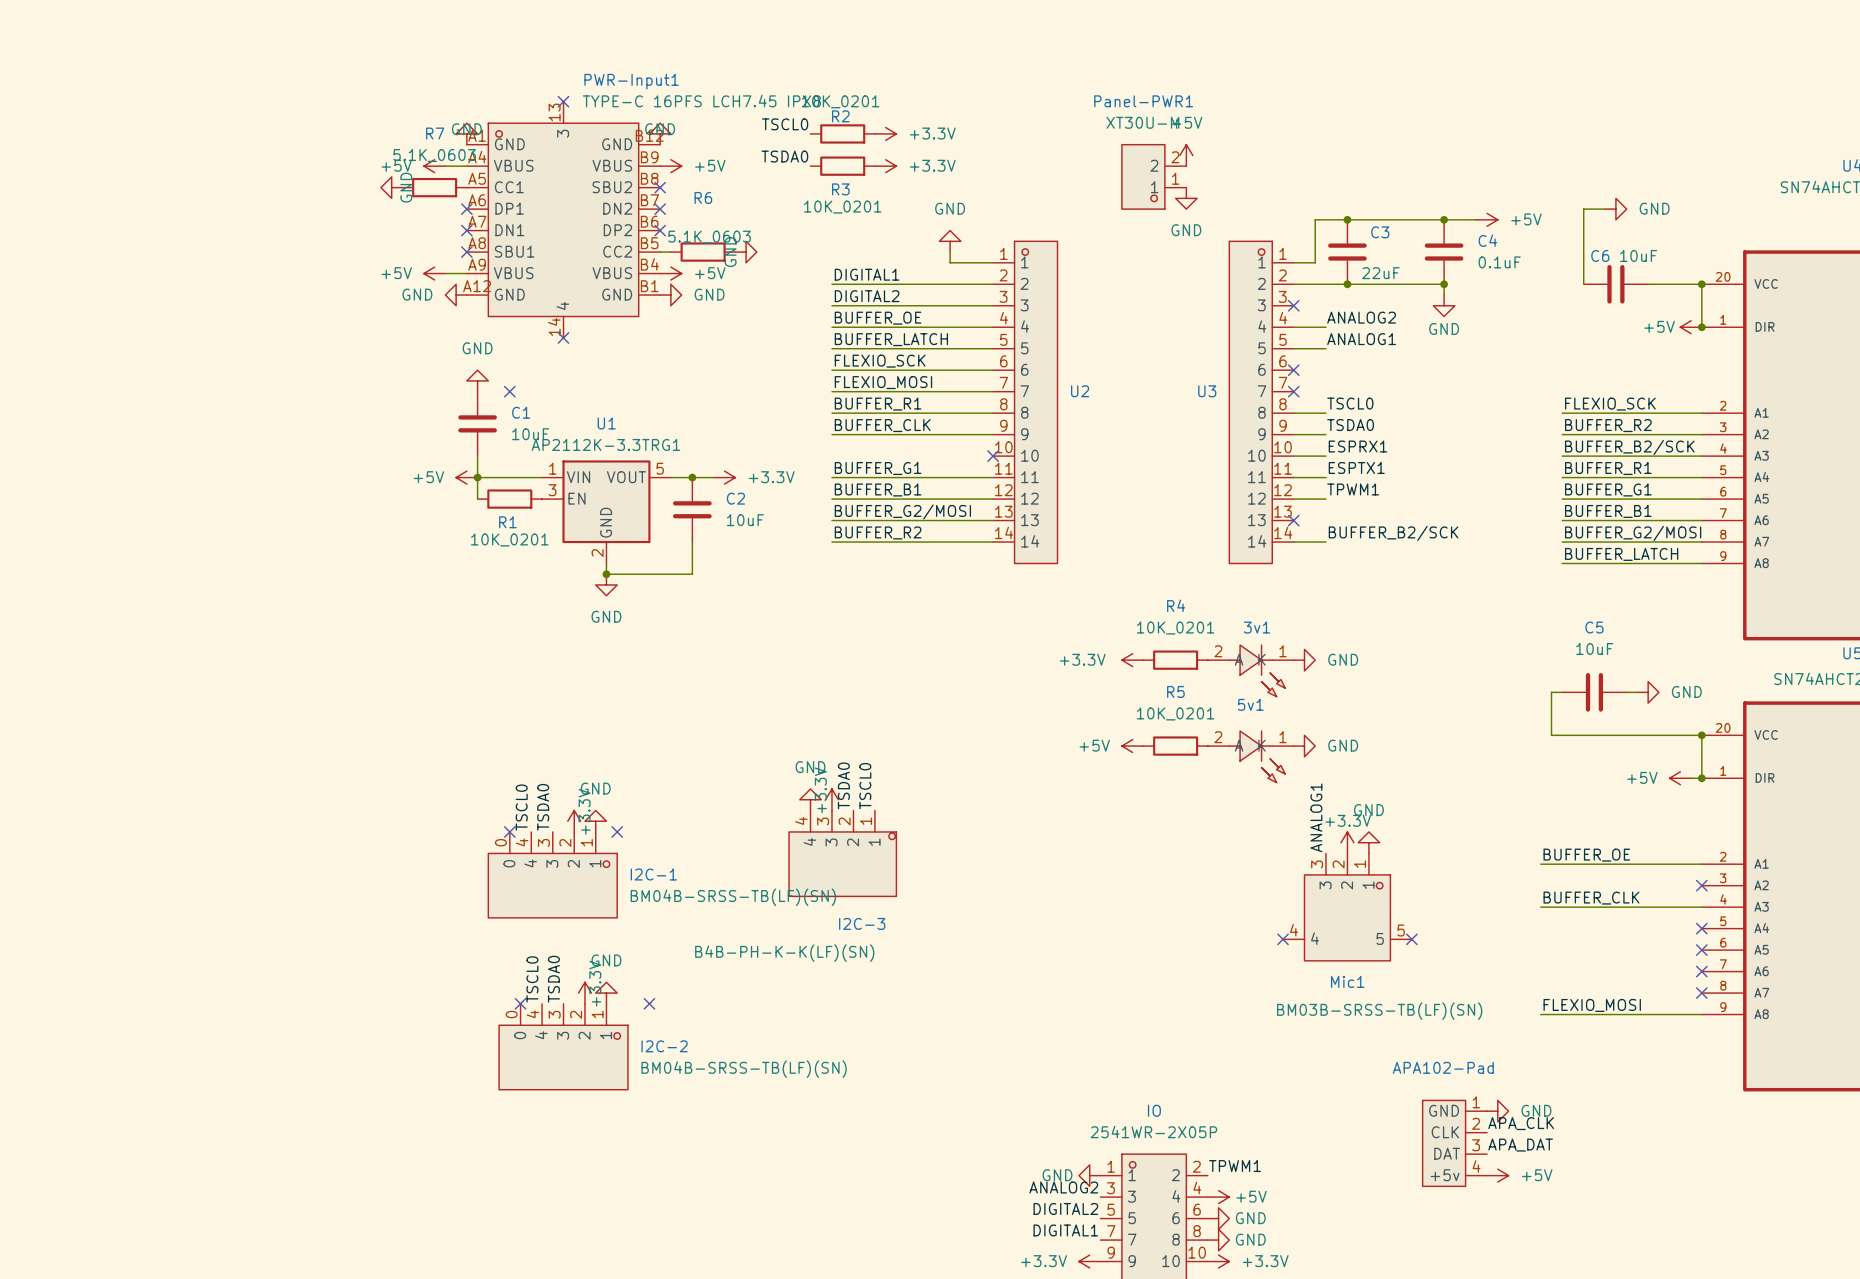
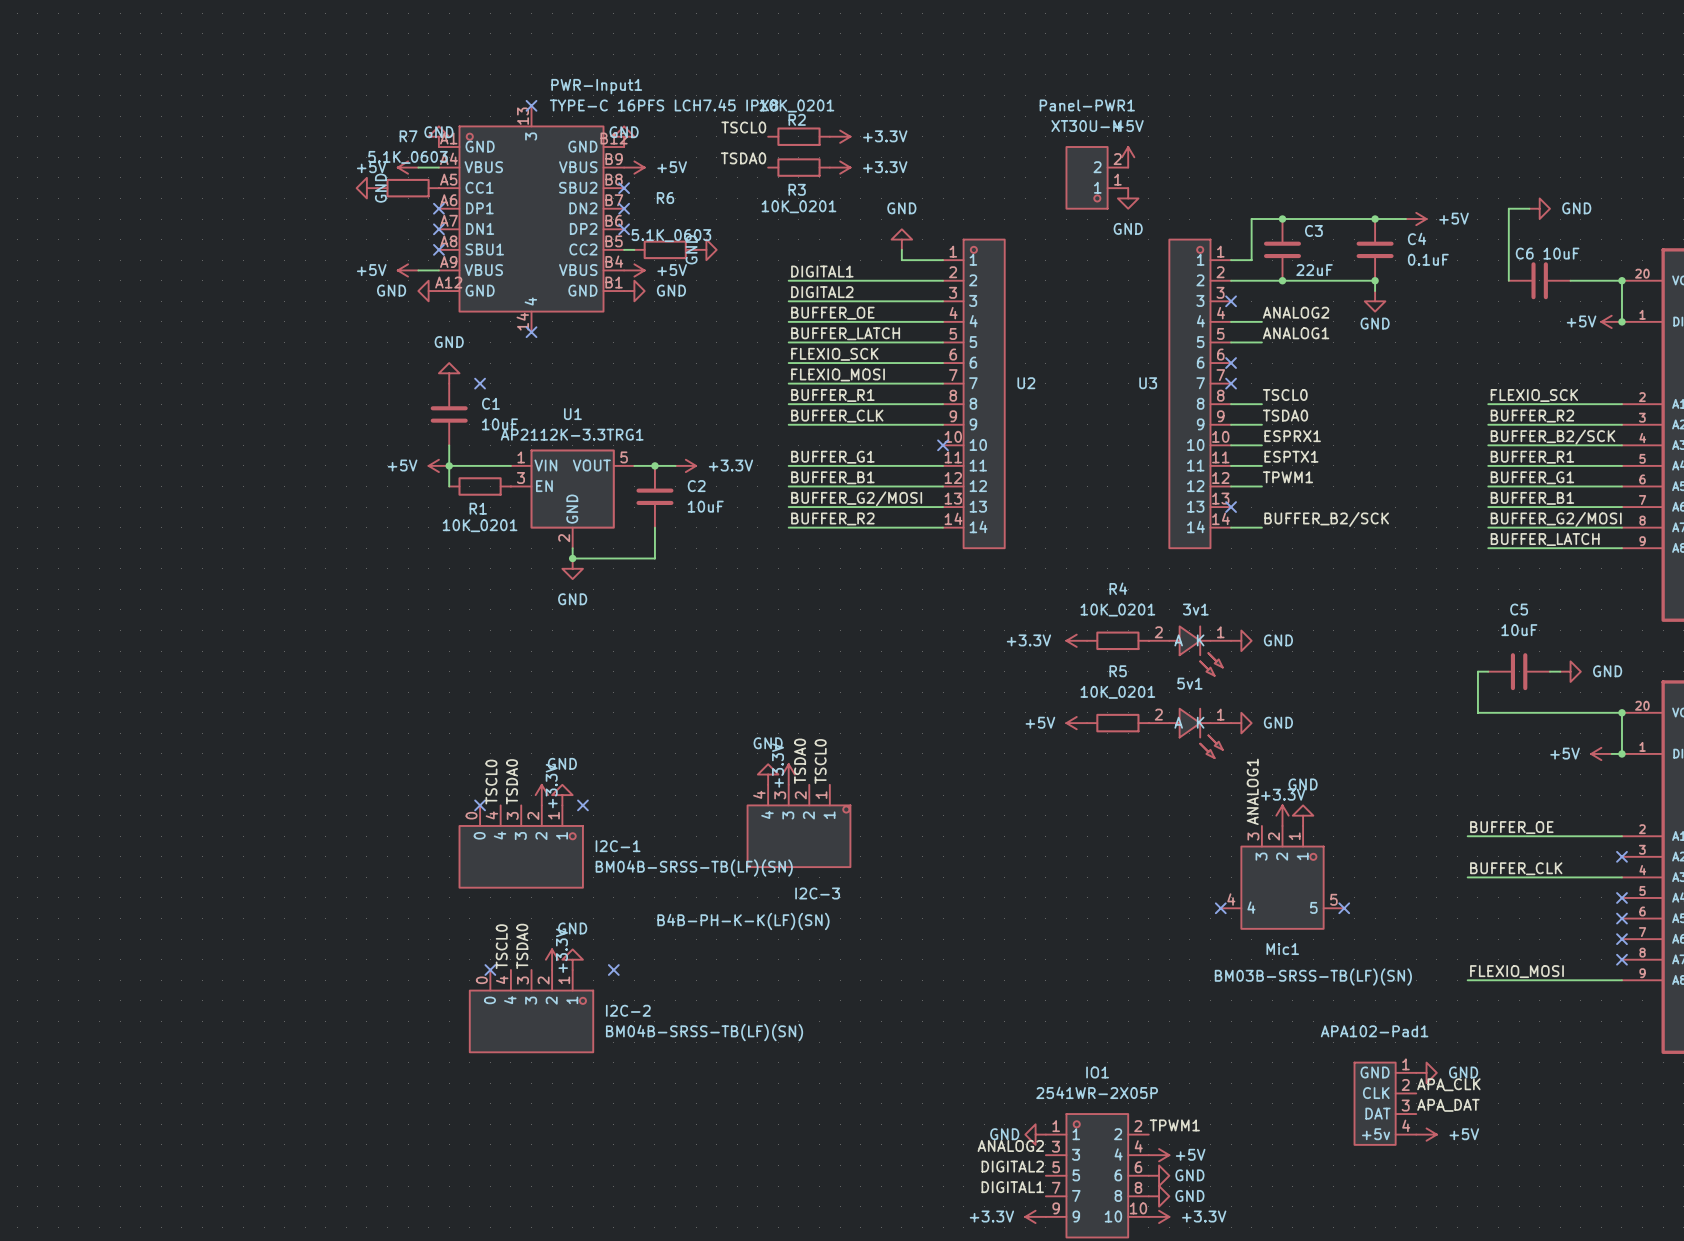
APA102-Pad name: APA102-Pad (1443, 1067) -> APA102-Pad1 (1374, 1031)
IO name: IO (1154, 1110) -> IO1 (1097, 1072)

